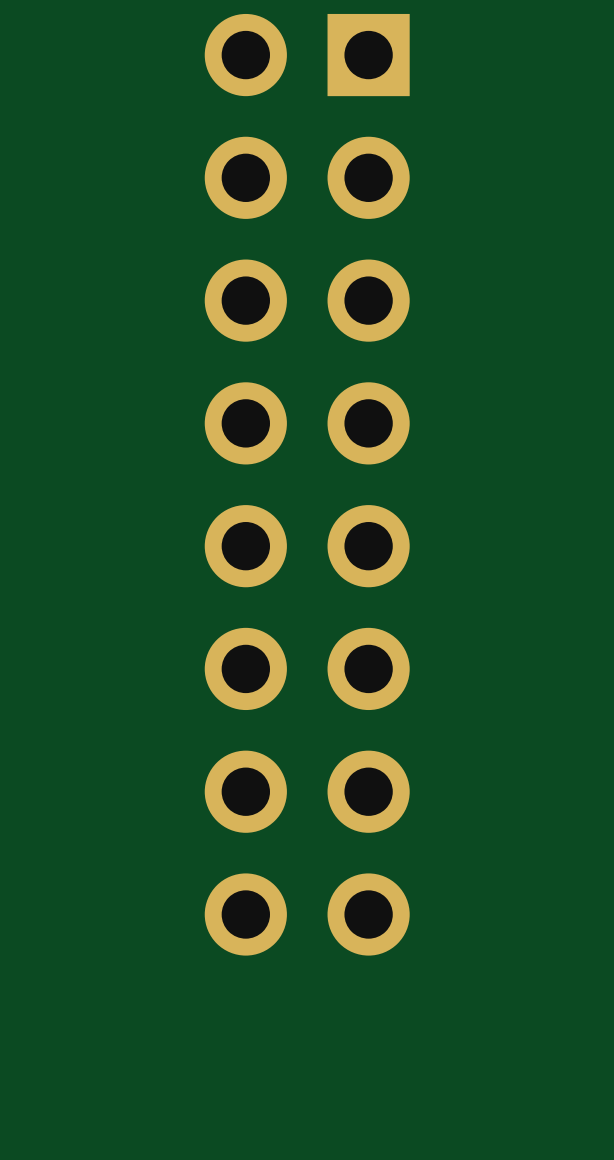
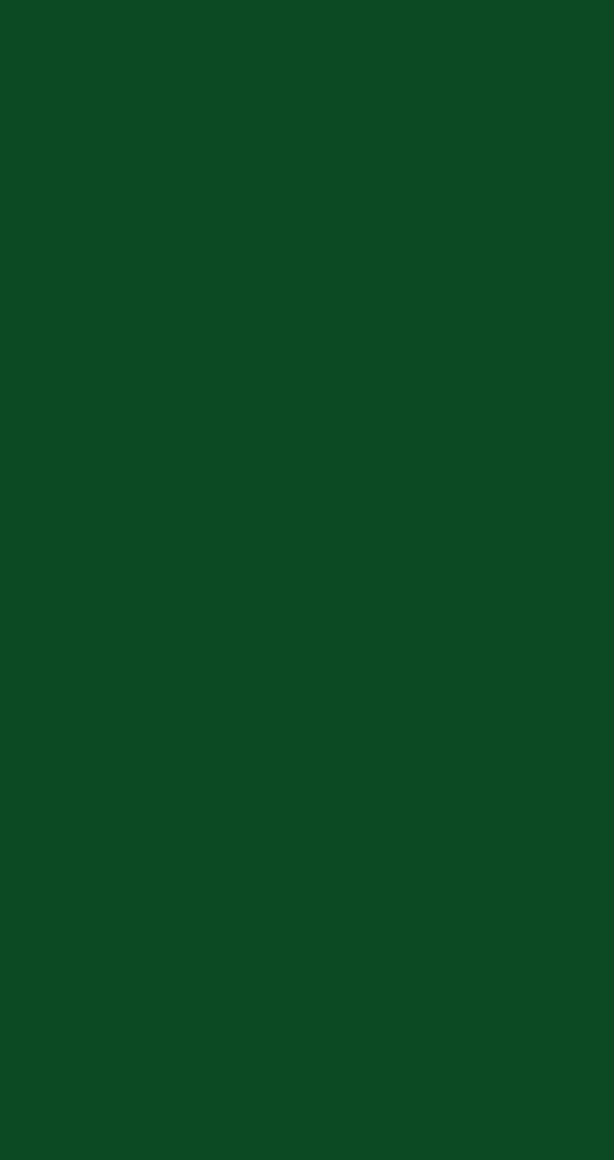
part: (307, 484) -> none

